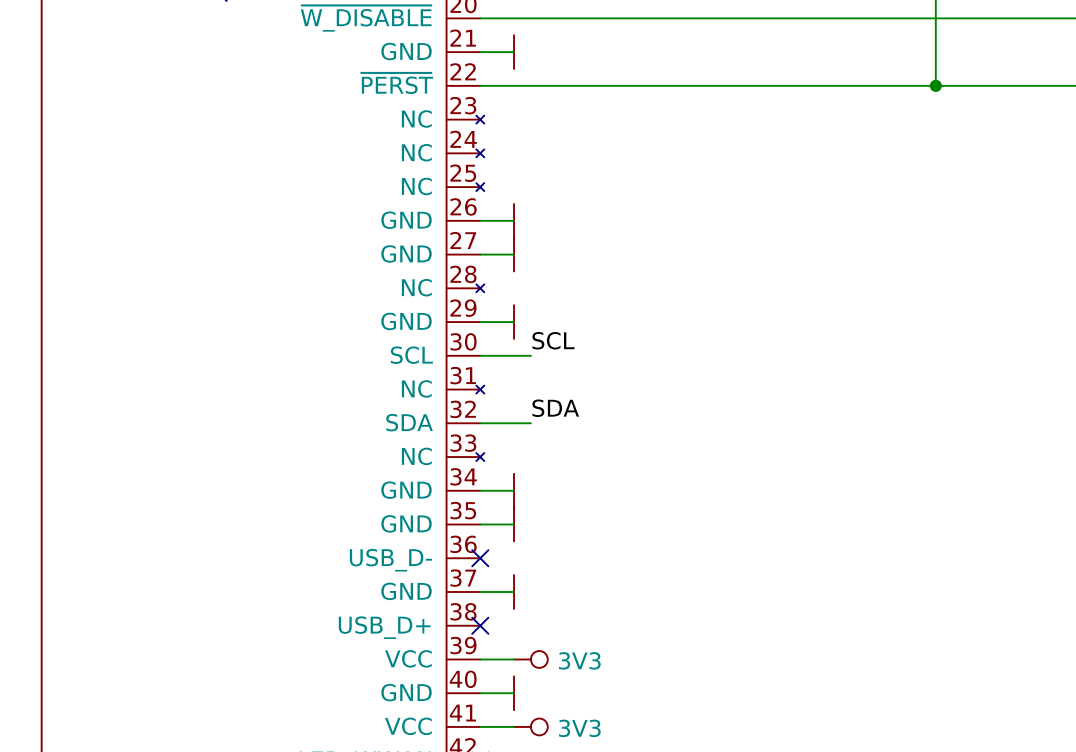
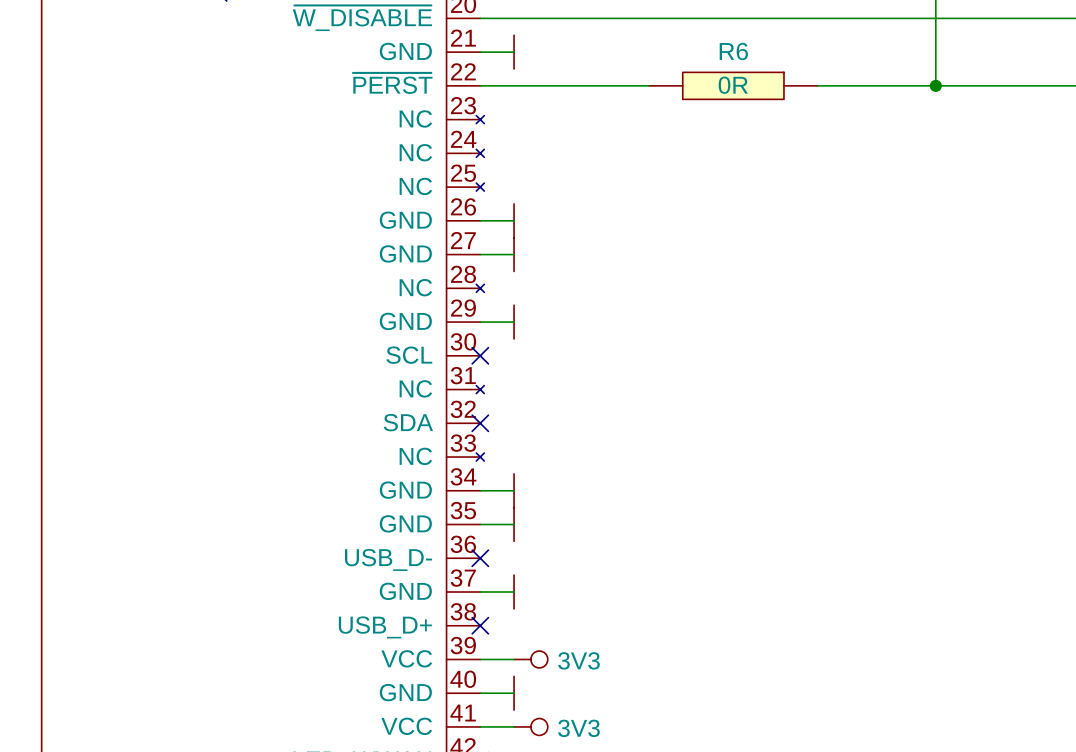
R6: none -> 0R (733, 85)
label: SCL (553, 340) -> none
wire: (480, 355) (530, 355) -> none
no-connect mark: none -> (480, 355)
label: SDA (555, 408) -> none
wire: (480, 423) (530, 423) -> none
no-connect mark: none -> (480, 423)

